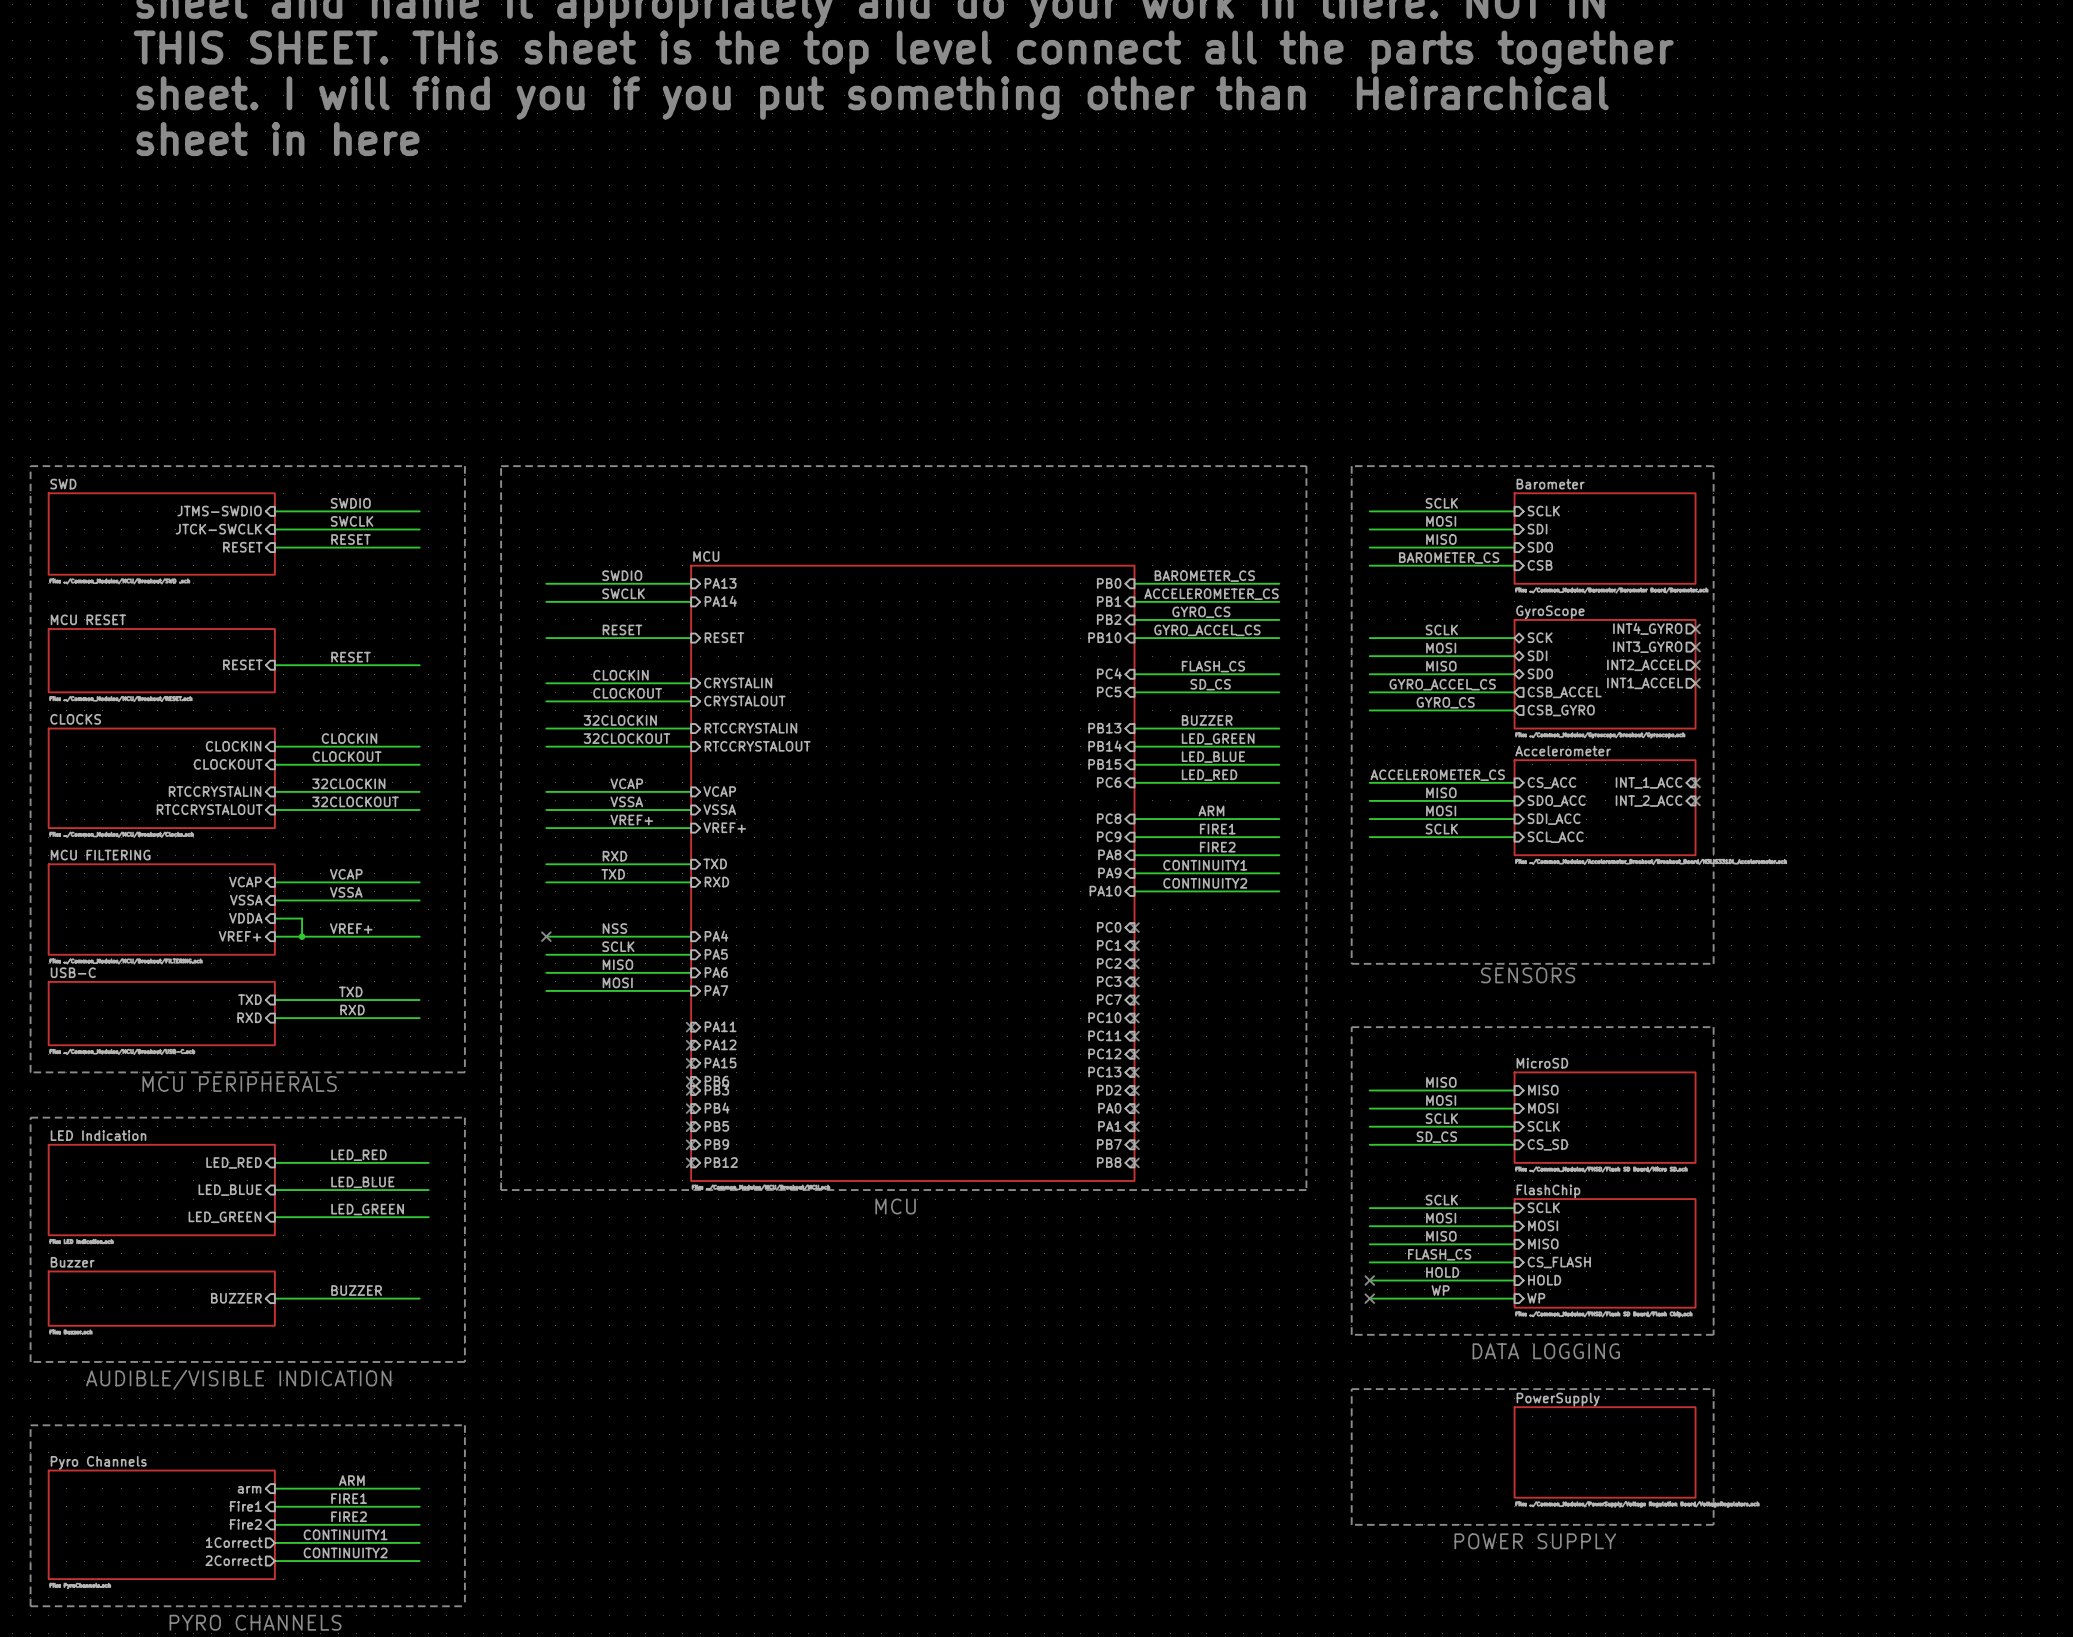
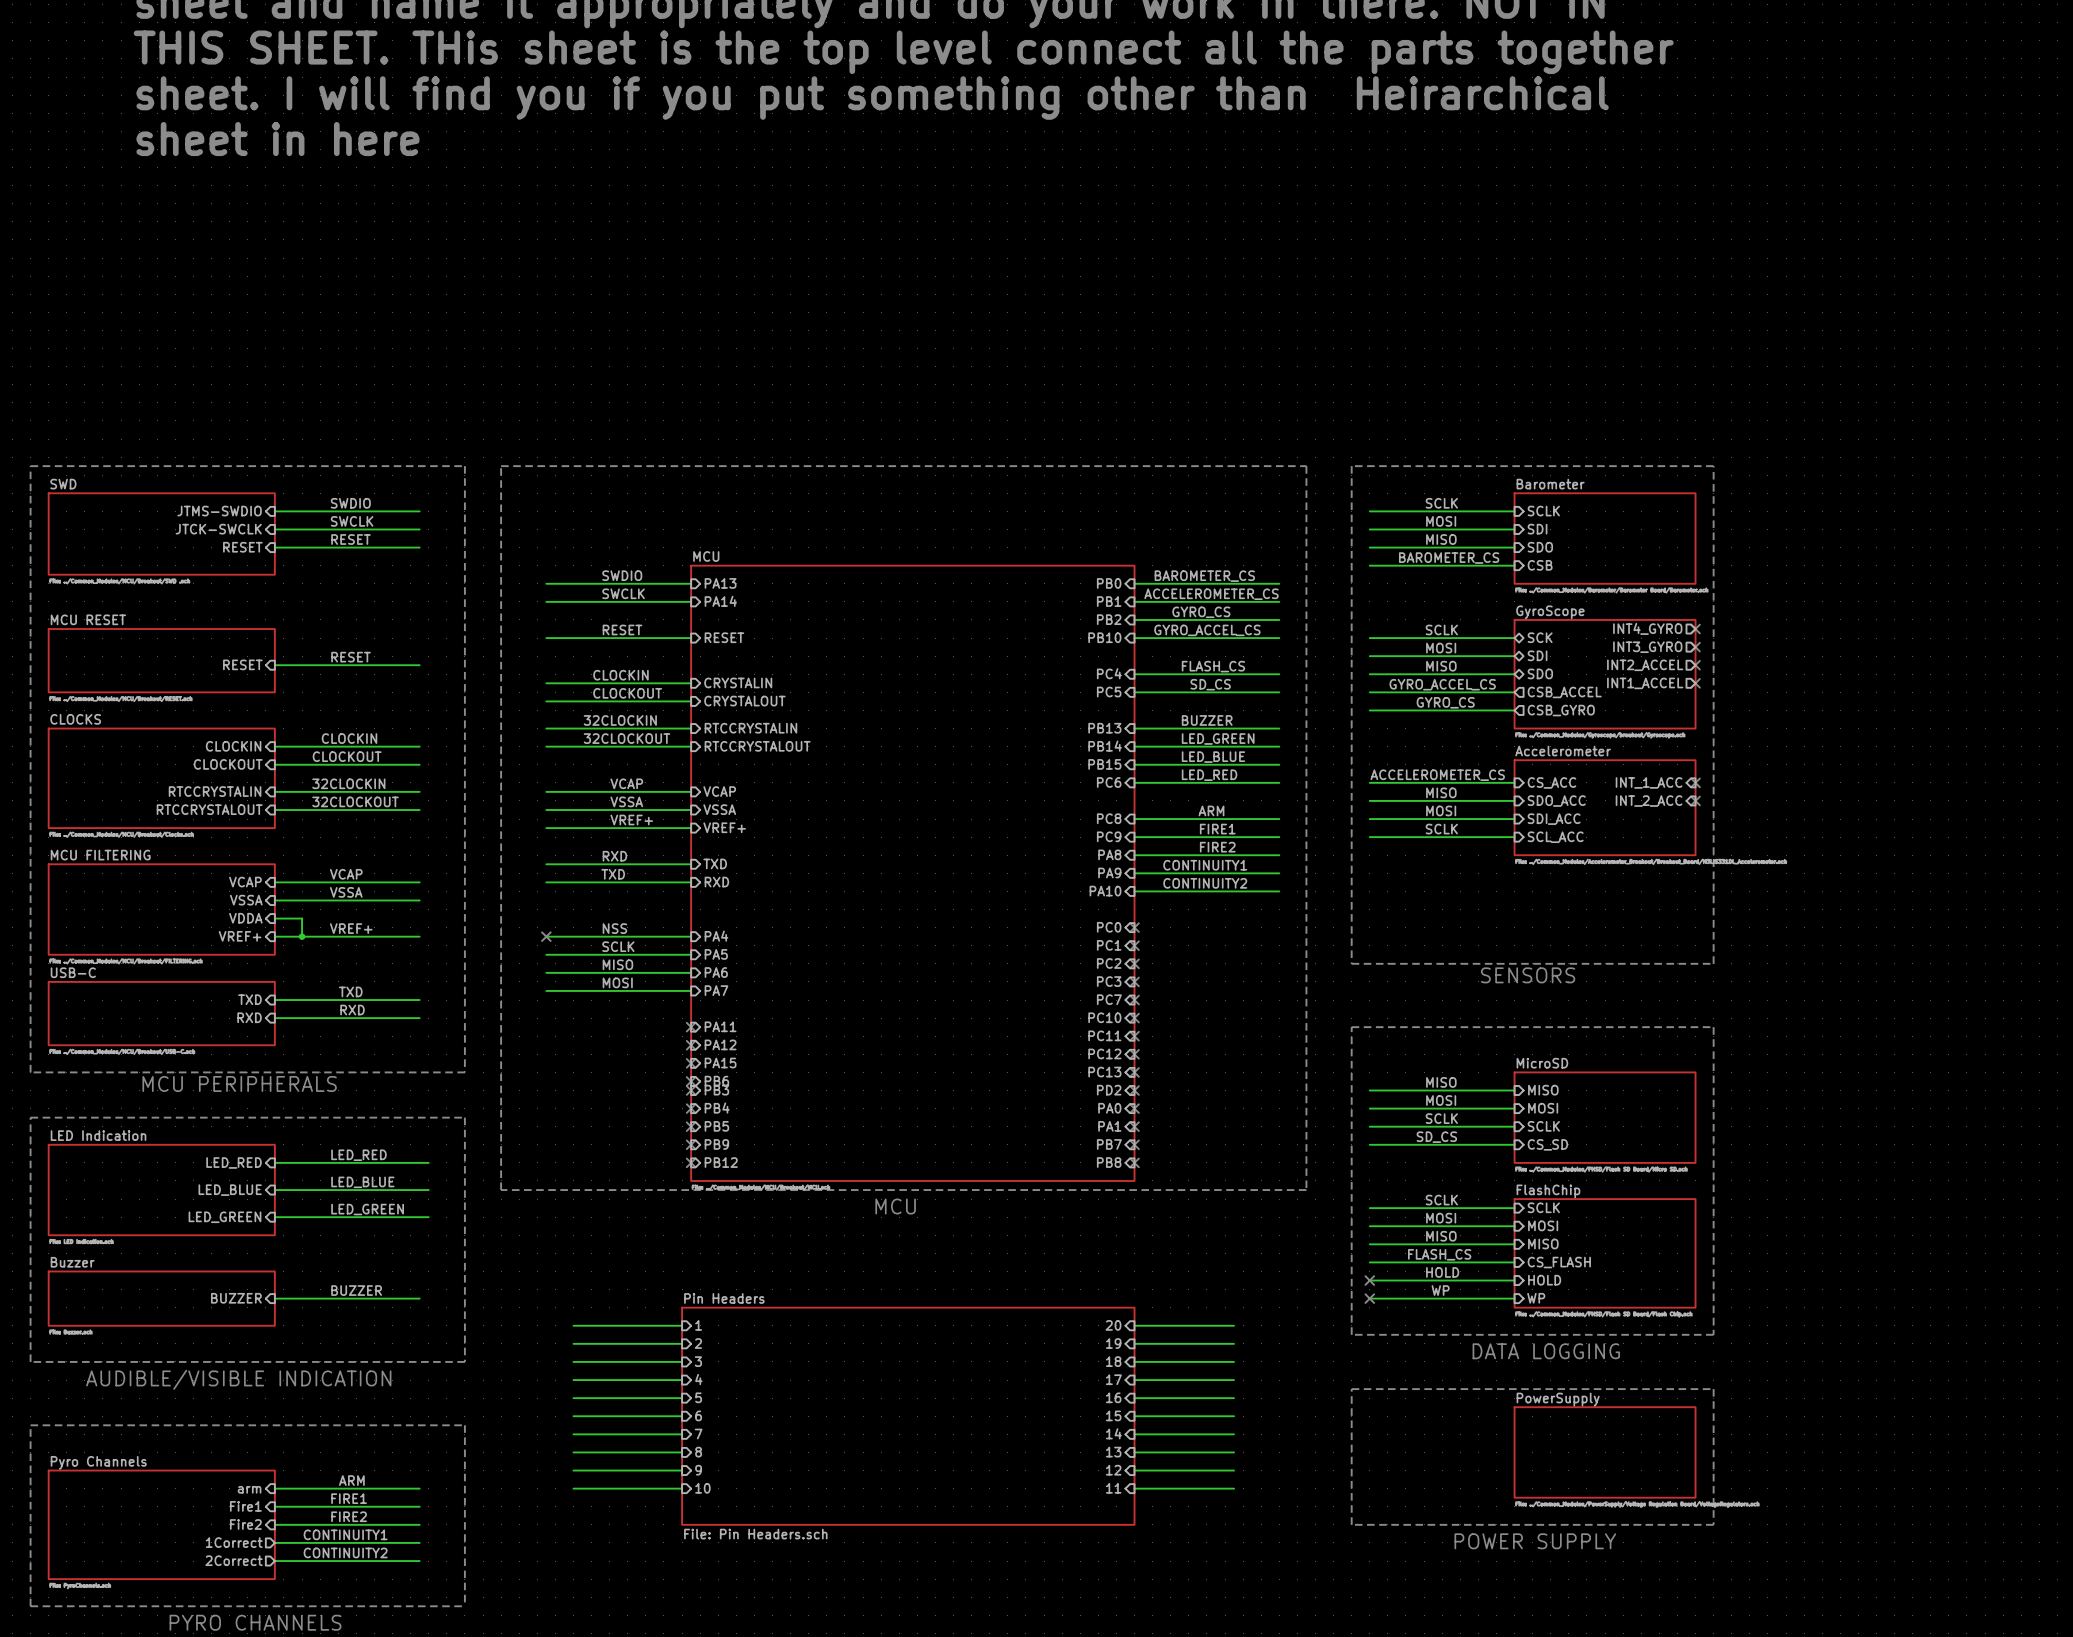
wire: none -> (573, 1325) (682, 1325)
sheet pin: none -> 1 (698, 1325)
sheet pin: none -> 20 (1113, 1325)
wire: none -> (1134, 1325) (1234, 1325)
wire: none -> (573, 1343) (682, 1343)
sheet pin: none -> 2 (698, 1343)
sheet pin: none -> 19 (1113, 1343)
wire: none -> (1134, 1343) (1234, 1343)
wire: none -> (573, 1361) (682, 1361)
sheet pin: none -> 3 (698, 1361)
sheet pin: none -> 18 (1113, 1361)
wire: none -> (1134, 1361) (1234, 1361)
sheet pin: none -> 4 (698, 1379)
sheet pin: none -> 17 (1113, 1379)
wire: none -> (573, 1380) (682, 1380)
wire: none -> (1134, 1380) (1234, 1380)
sheet pin: none -> 5 (698, 1397)
sheet pin: none -> 16 (1113, 1397)
wire: none -> (573, 1398) (682, 1398)
wire: none -> (1134, 1398) (1234, 1398)
sheet pin: none -> 6 (698, 1415)
sheet pin: none -> 15 (1113, 1415)
wire: none -> (573, 1416) (682, 1416)
sheet Pin Headers: none -> File: Pin Headers.sch (908, 1416)
wire: none -> (1134, 1416) (1234, 1416)
sheet pin: none -> 14 (1113, 1433)
wire: none -> (573, 1434) (682, 1434)
sheet pin: none -> 7 (698, 1434)
wire: none -> (1134, 1434) (1234, 1434)
wire: none -> (573, 1452) (682, 1452)
sheet pin: none -> 8 (698, 1452)
sheet pin: none -> 13 (1113, 1452)
wire: none -> (1134, 1452) (1234, 1452)
wire: none -> (573, 1470) (682, 1470)
sheet pin: none -> 9 (698, 1470)
sheet pin: none -> 12 (1113, 1470)
wire: none -> (1134, 1470) (1234, 1470)
wire: none -> (573, 1488) (682, 1488)
sheet pin: none -> 10 (702, 1488)
sheet pin: none -> 11 (1113, 1488)
wire: none -> (1134, 1488) (1234, 1488)

